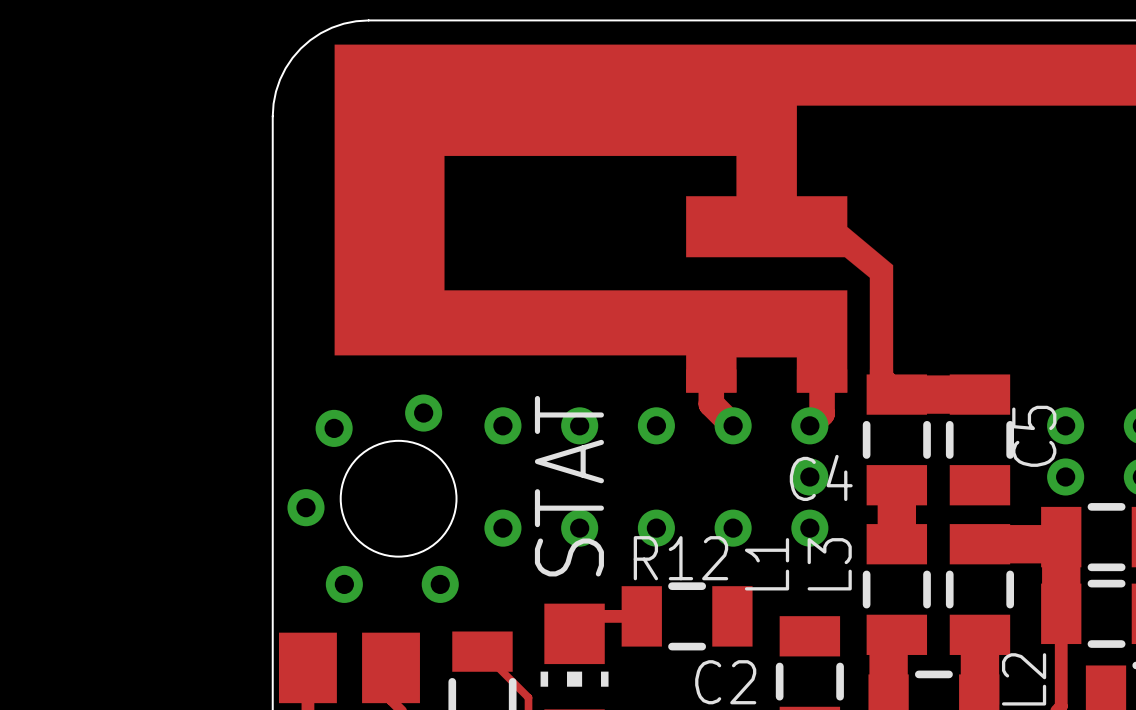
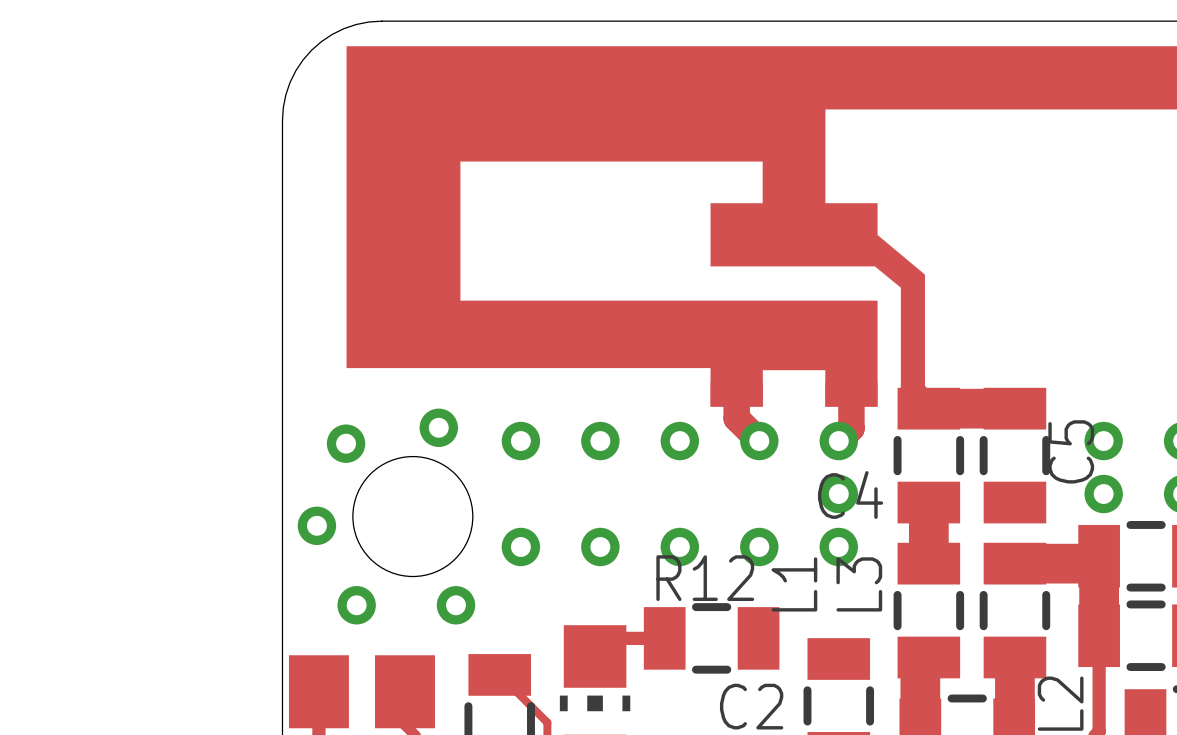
text: STAT (569, 486) -> none

